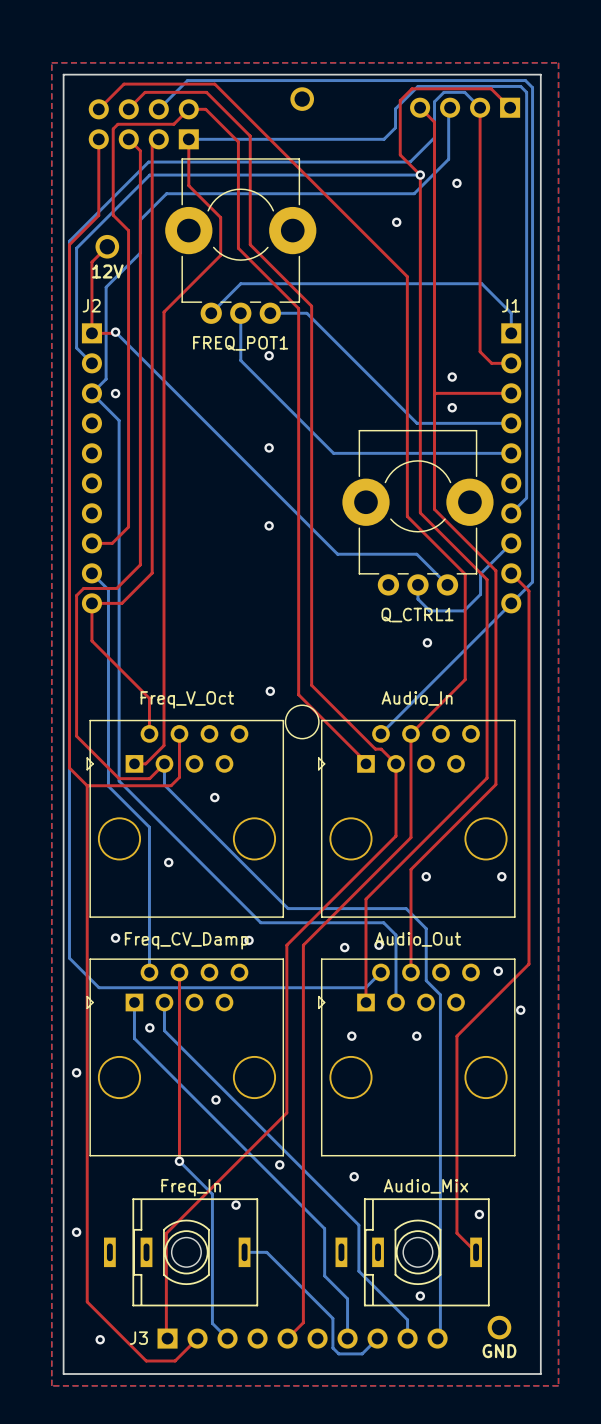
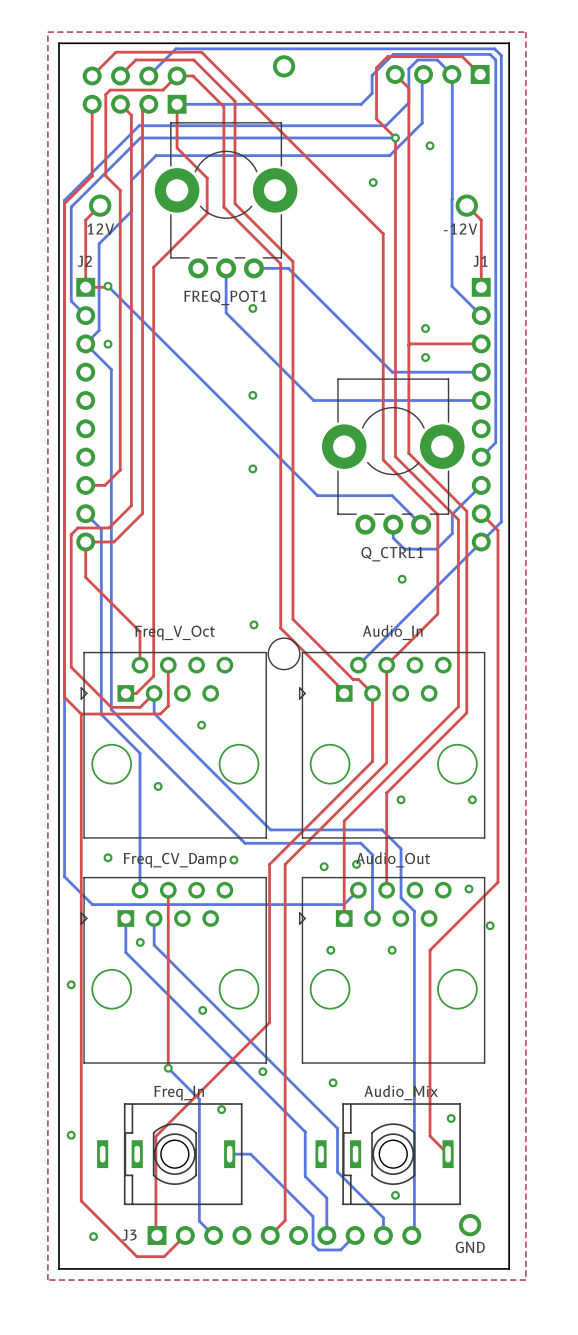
bottom track: none -> (451, 74) (452, 286) (481, 315)
top track: (480, 107) (480, 351) (491, 363) (511, 363) -> none
top track: none -> (466, 205) (481, 220) (481, 287)
part: none -> (466, 205)
text: none -> -12V (460, 229)
bottom track: (211, 313) (240, 283) (481, 283) (511, 313) (511, 333) -> none

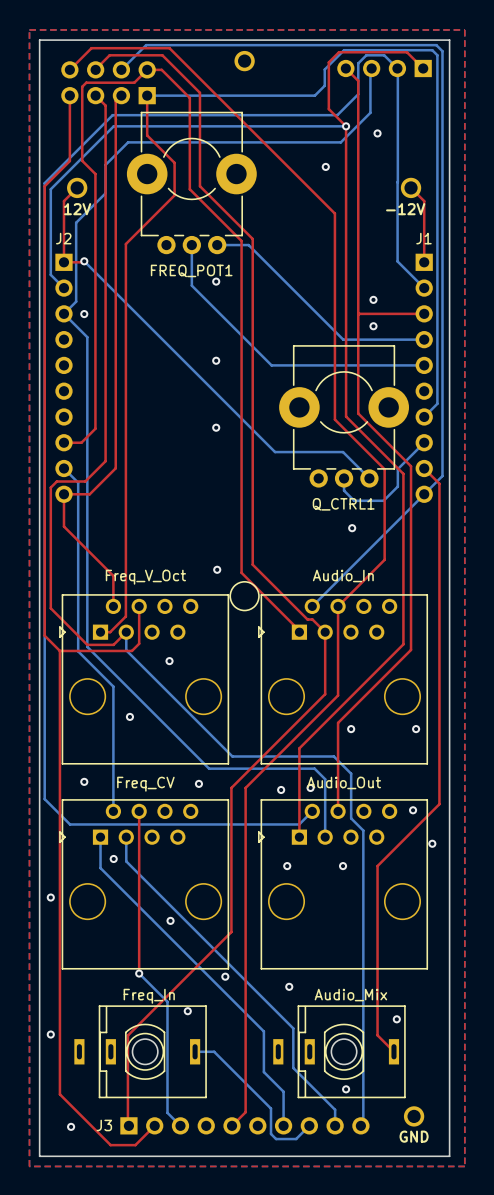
part value: Freq_CV_Damp (175, 860) -> Freq_CV (145, 784)

